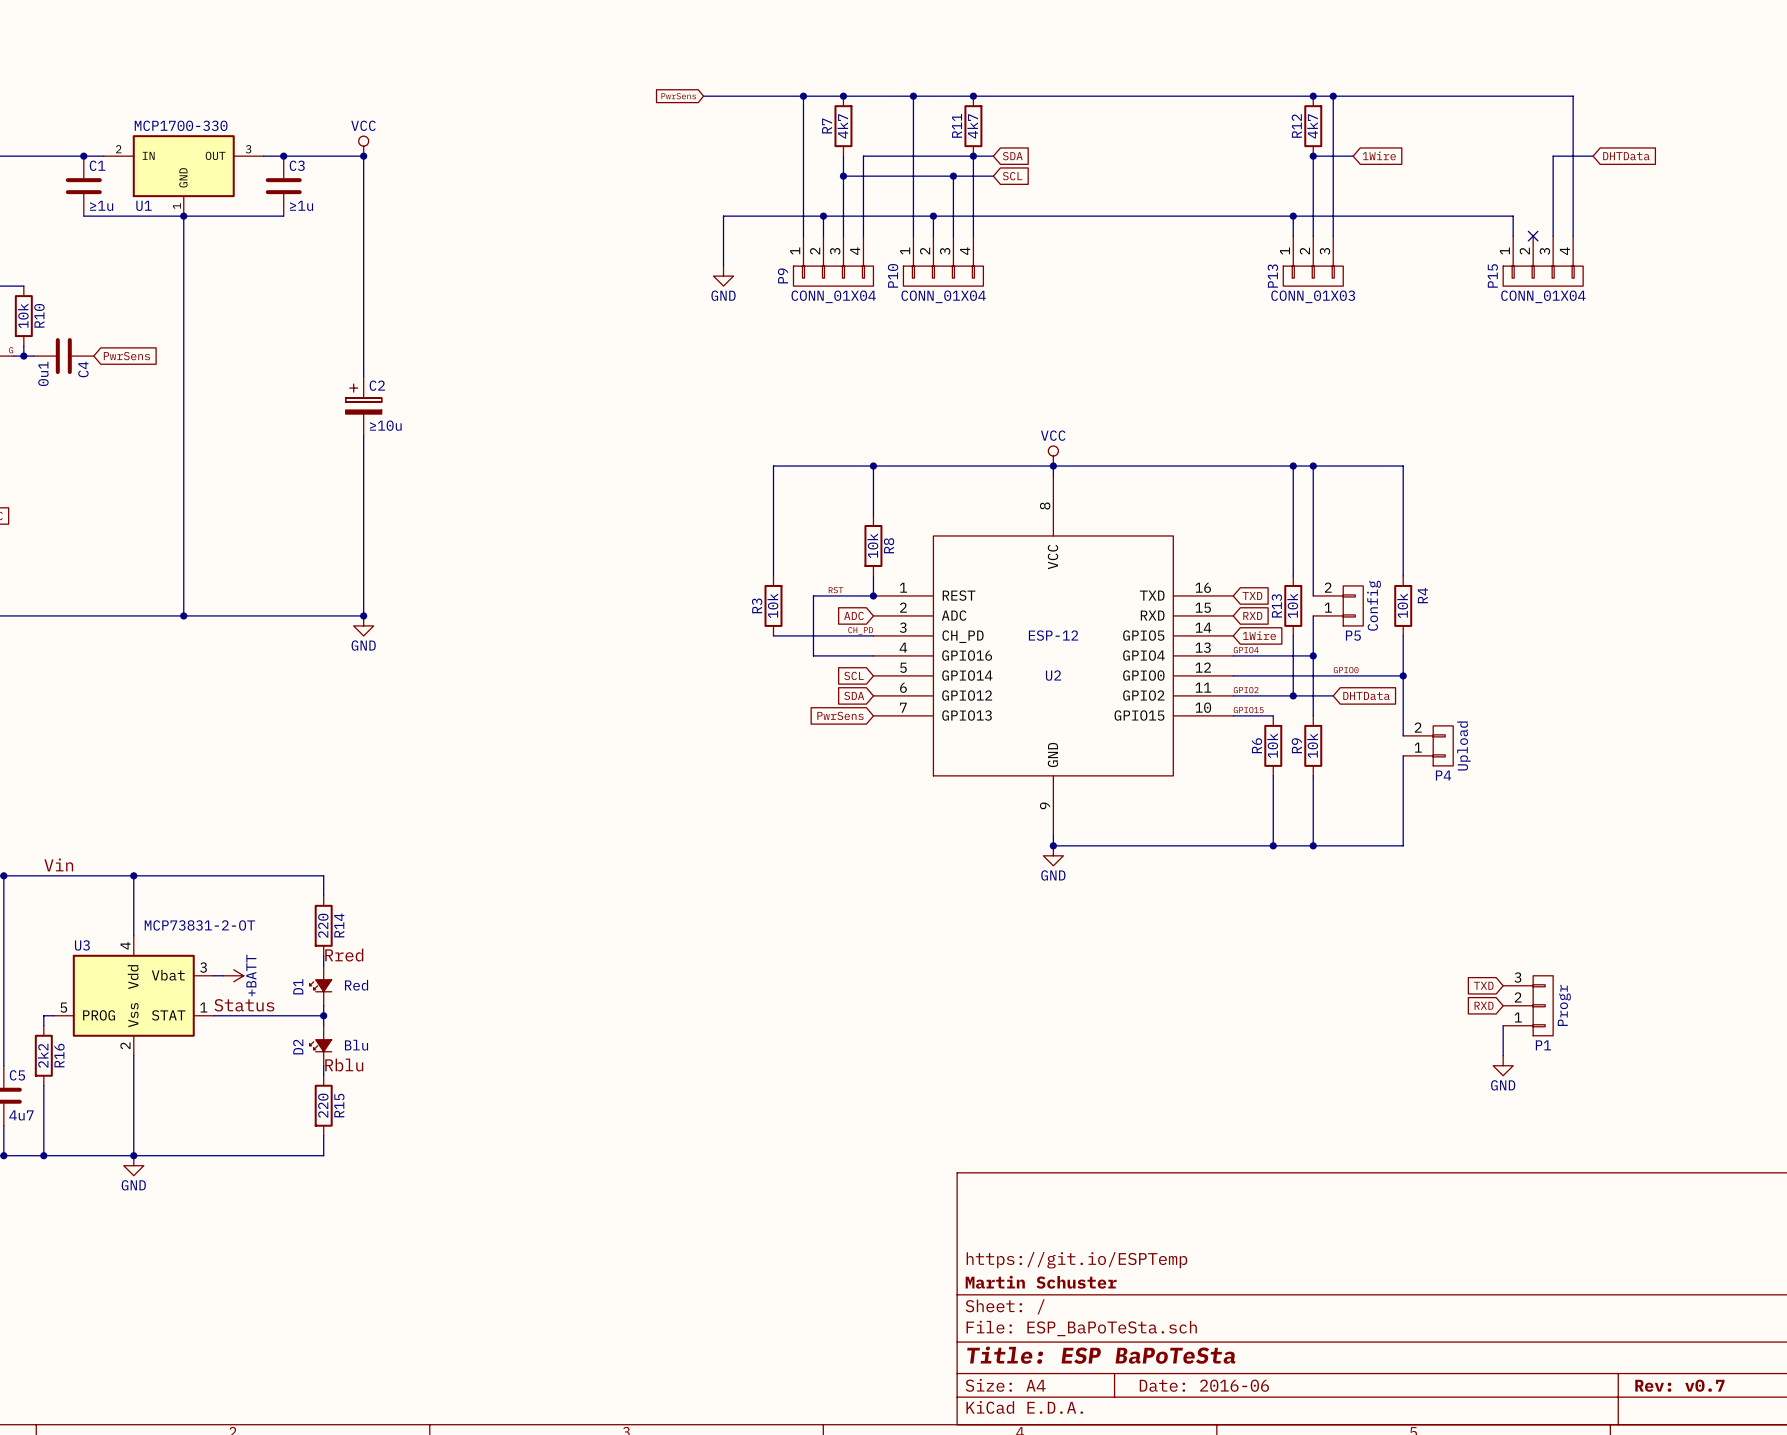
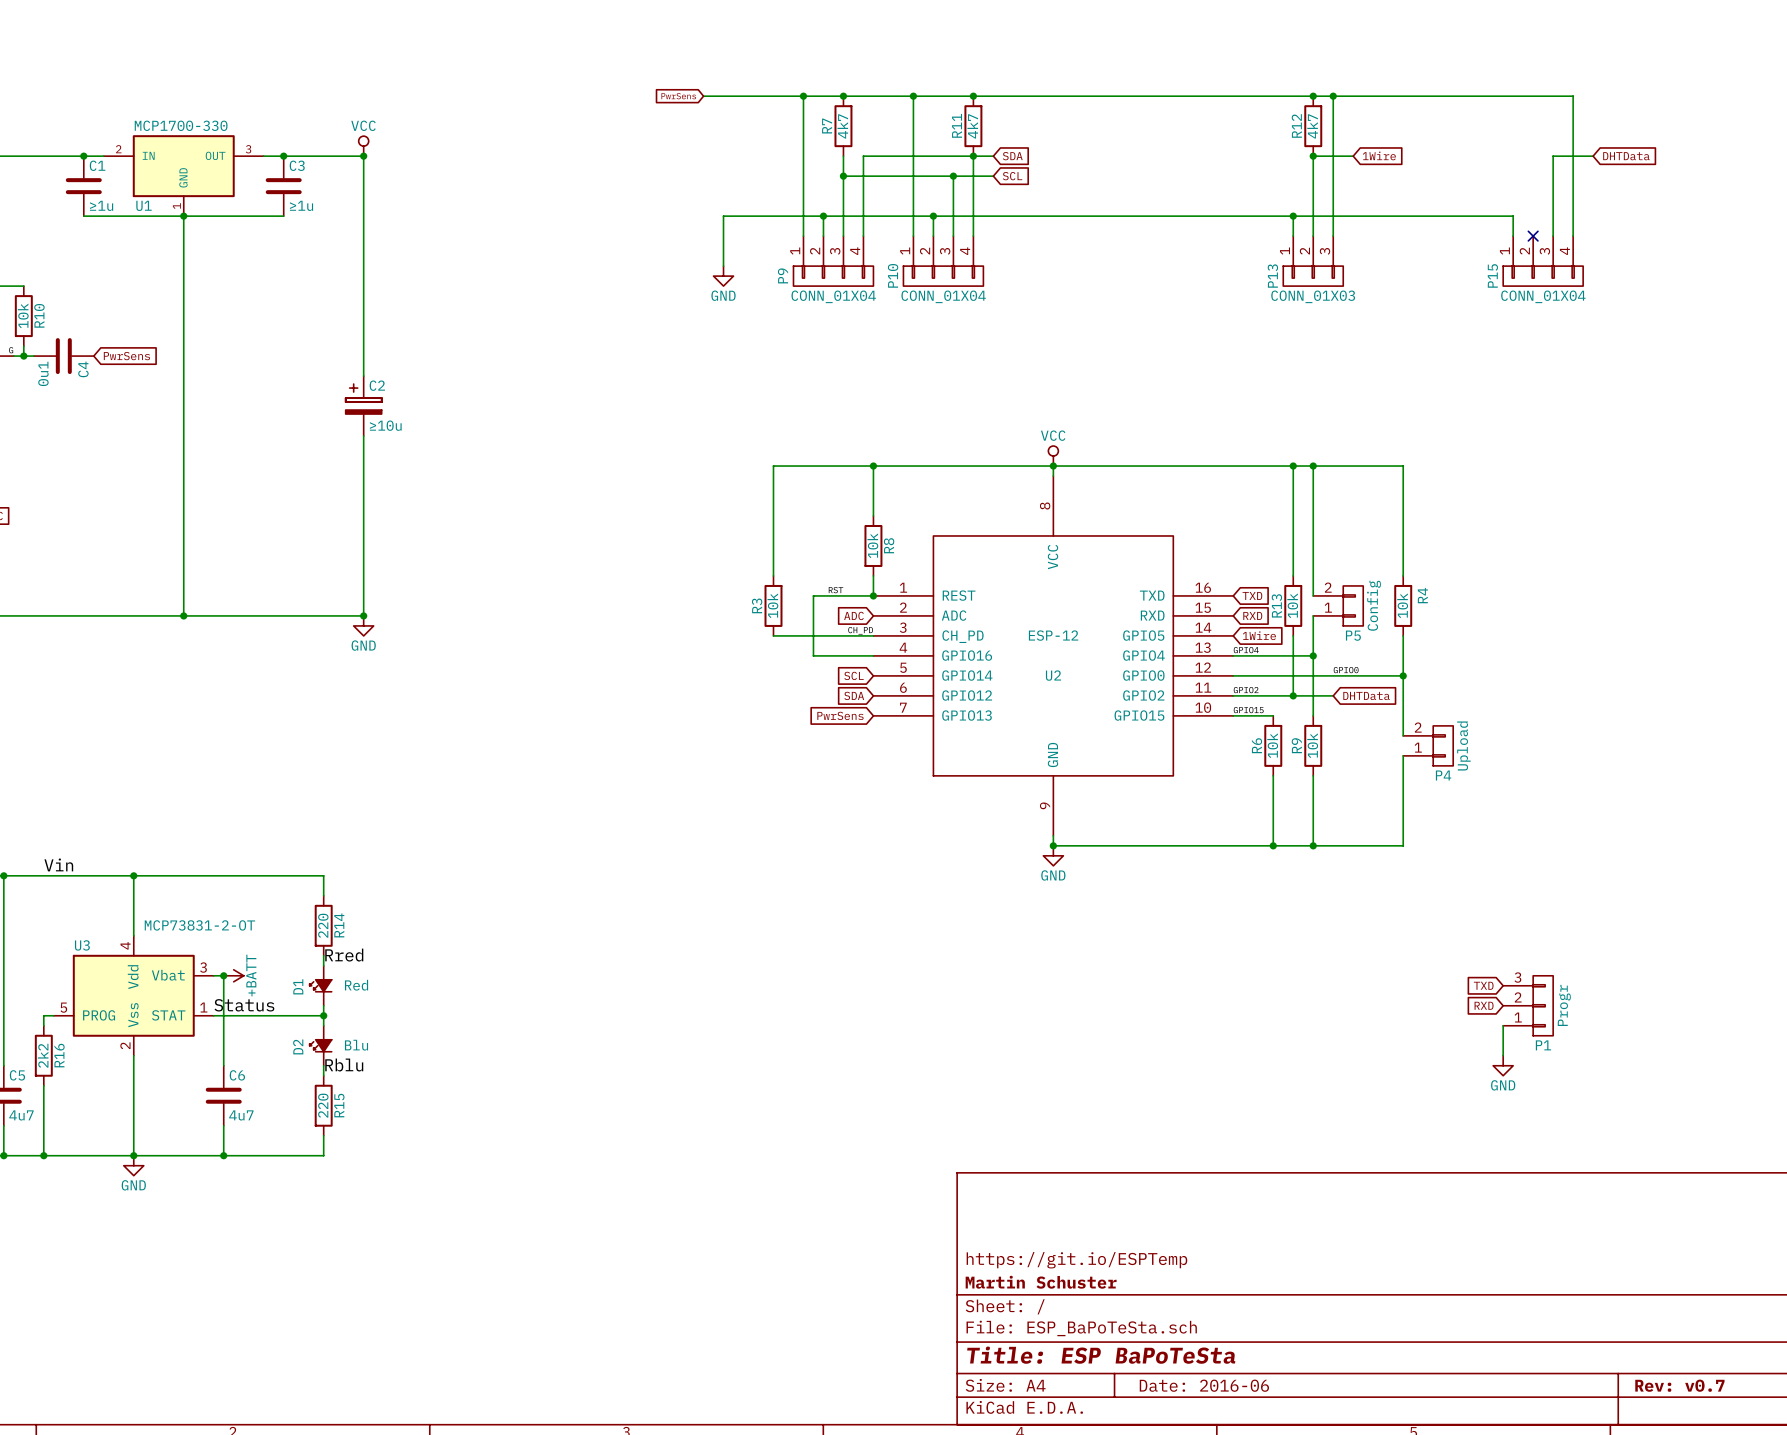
wire: none -> (223, 975) (223, 1065)
junction: none -> (223, 975)
C6: none -> 4u7 (223, 1095)
wire: none -> (223, 1125) (223, 1155)
junction: none -> (223, 1155)

